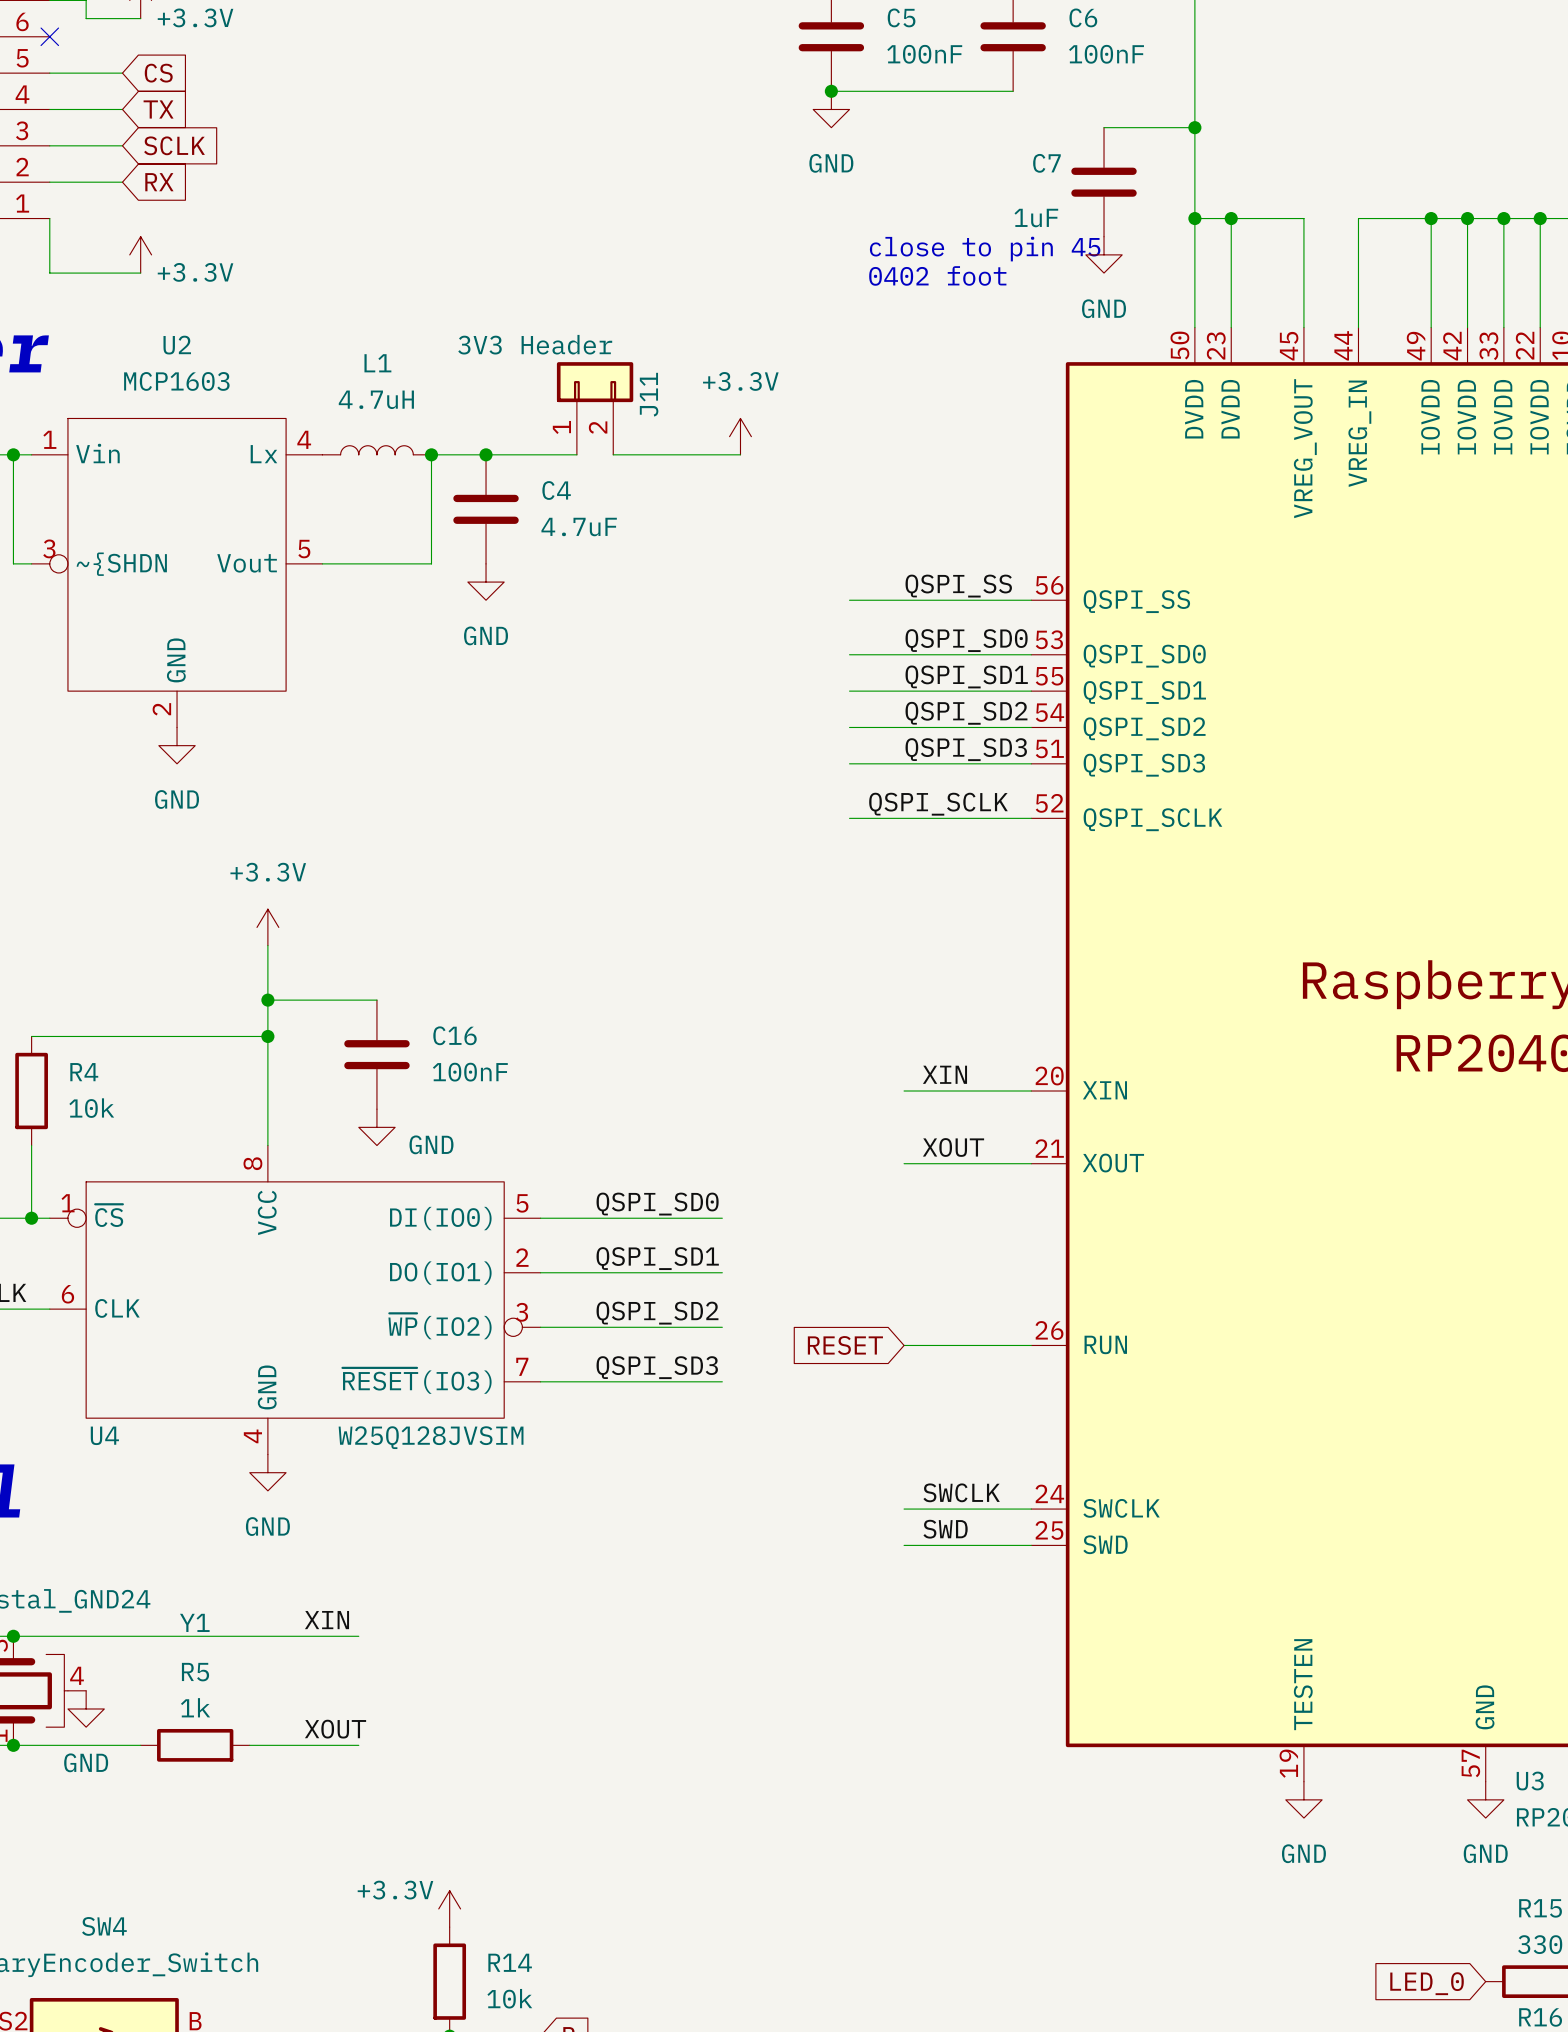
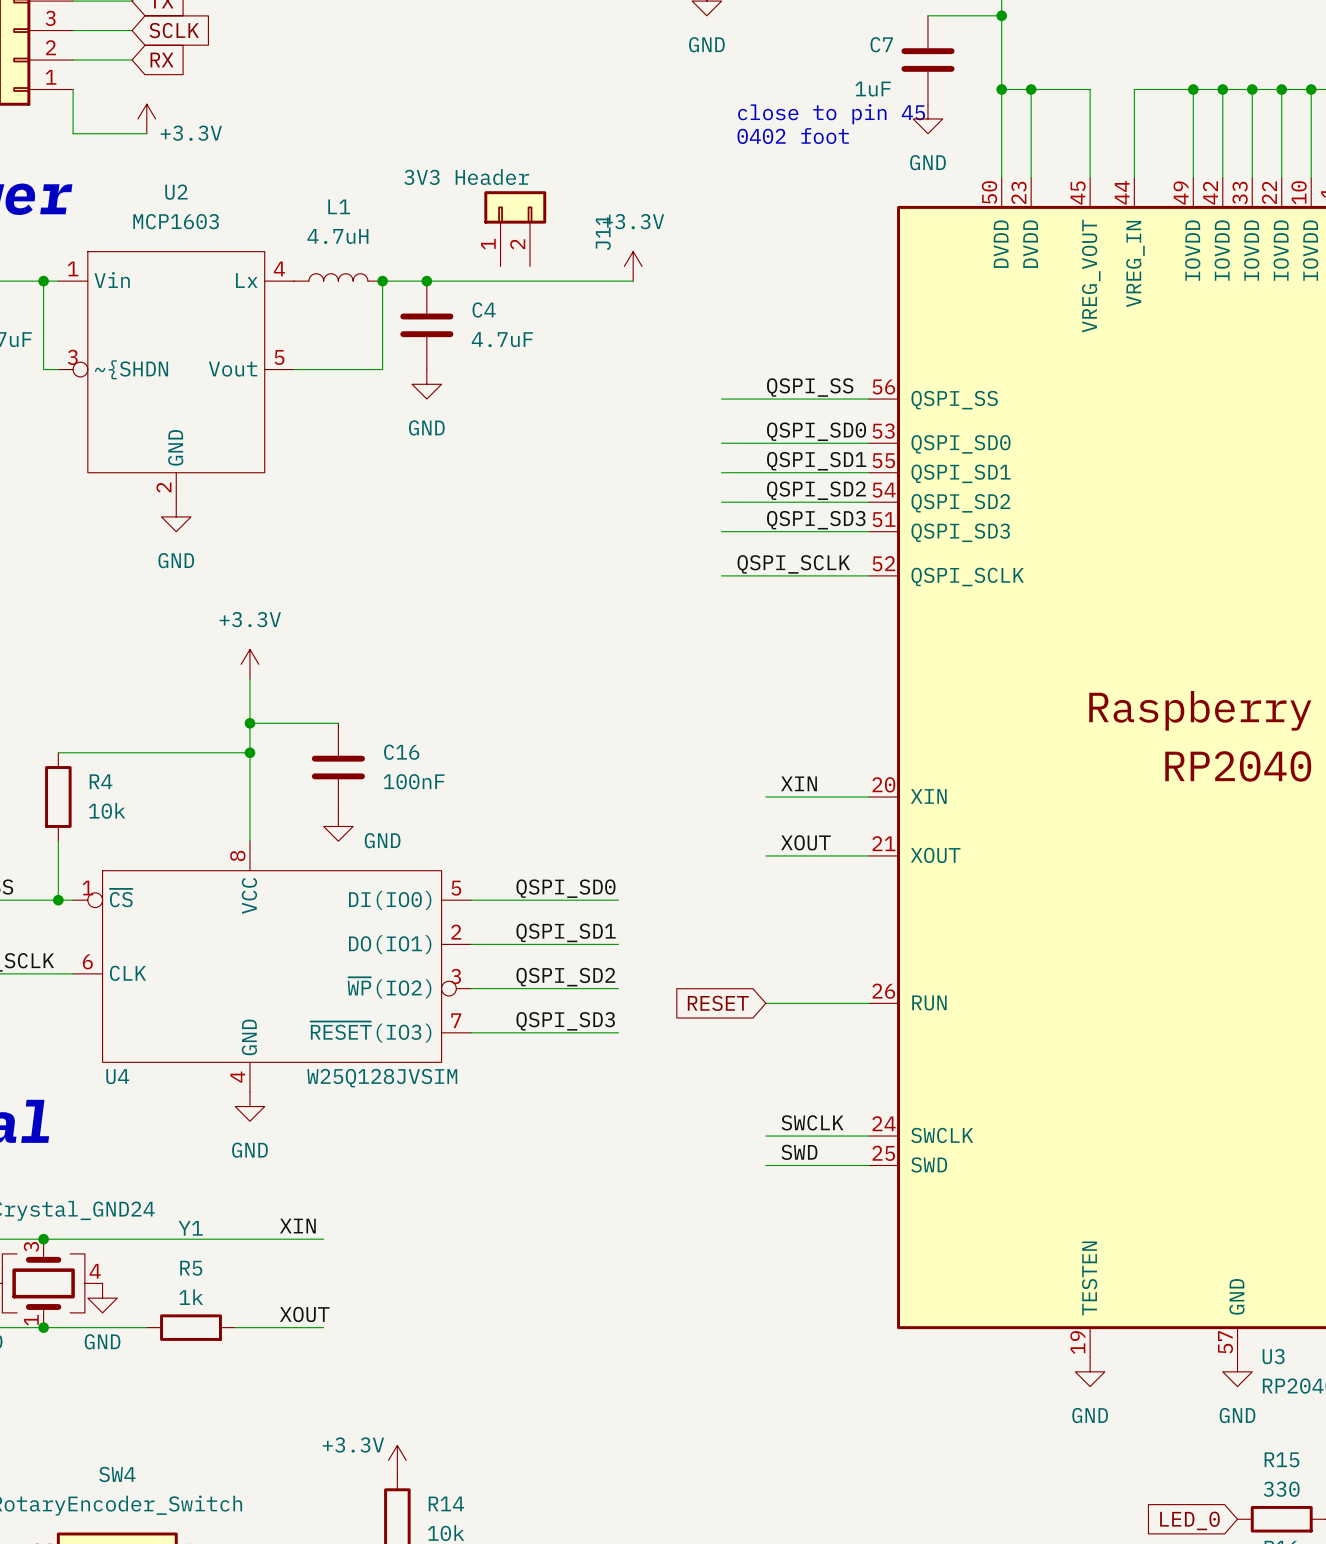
J11 name position: J11 (649, 394) -> J11 (603, 232)
J11 position: (595, 408) -> (515, 228)
wire: none -> (500, 281) (530, 281)

